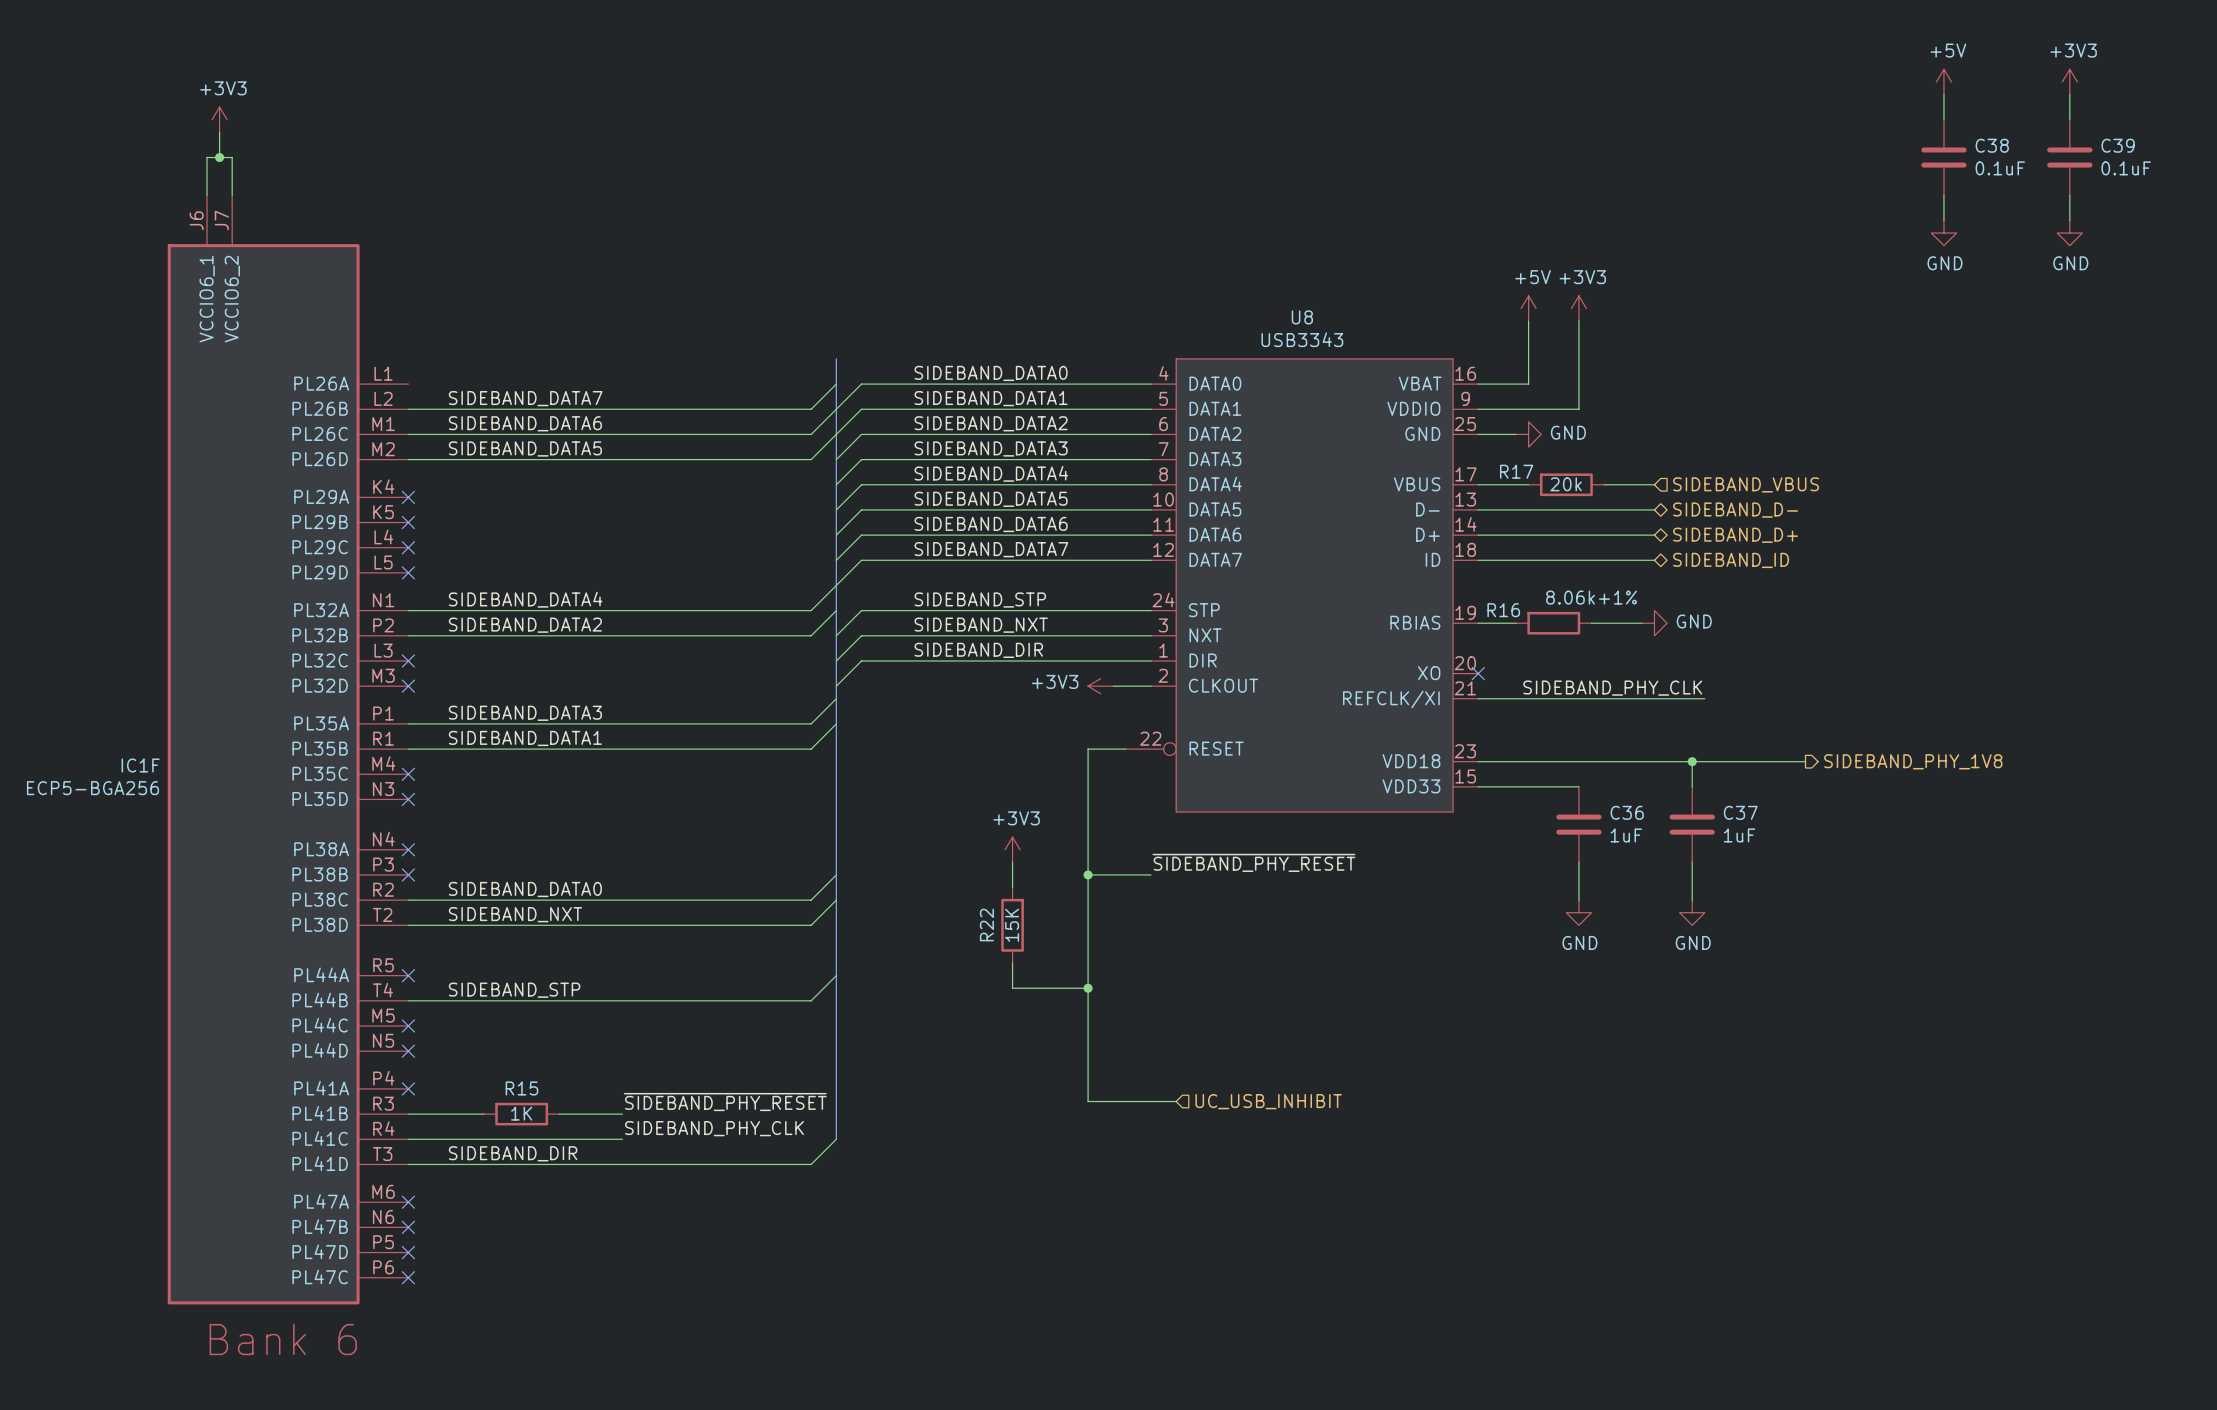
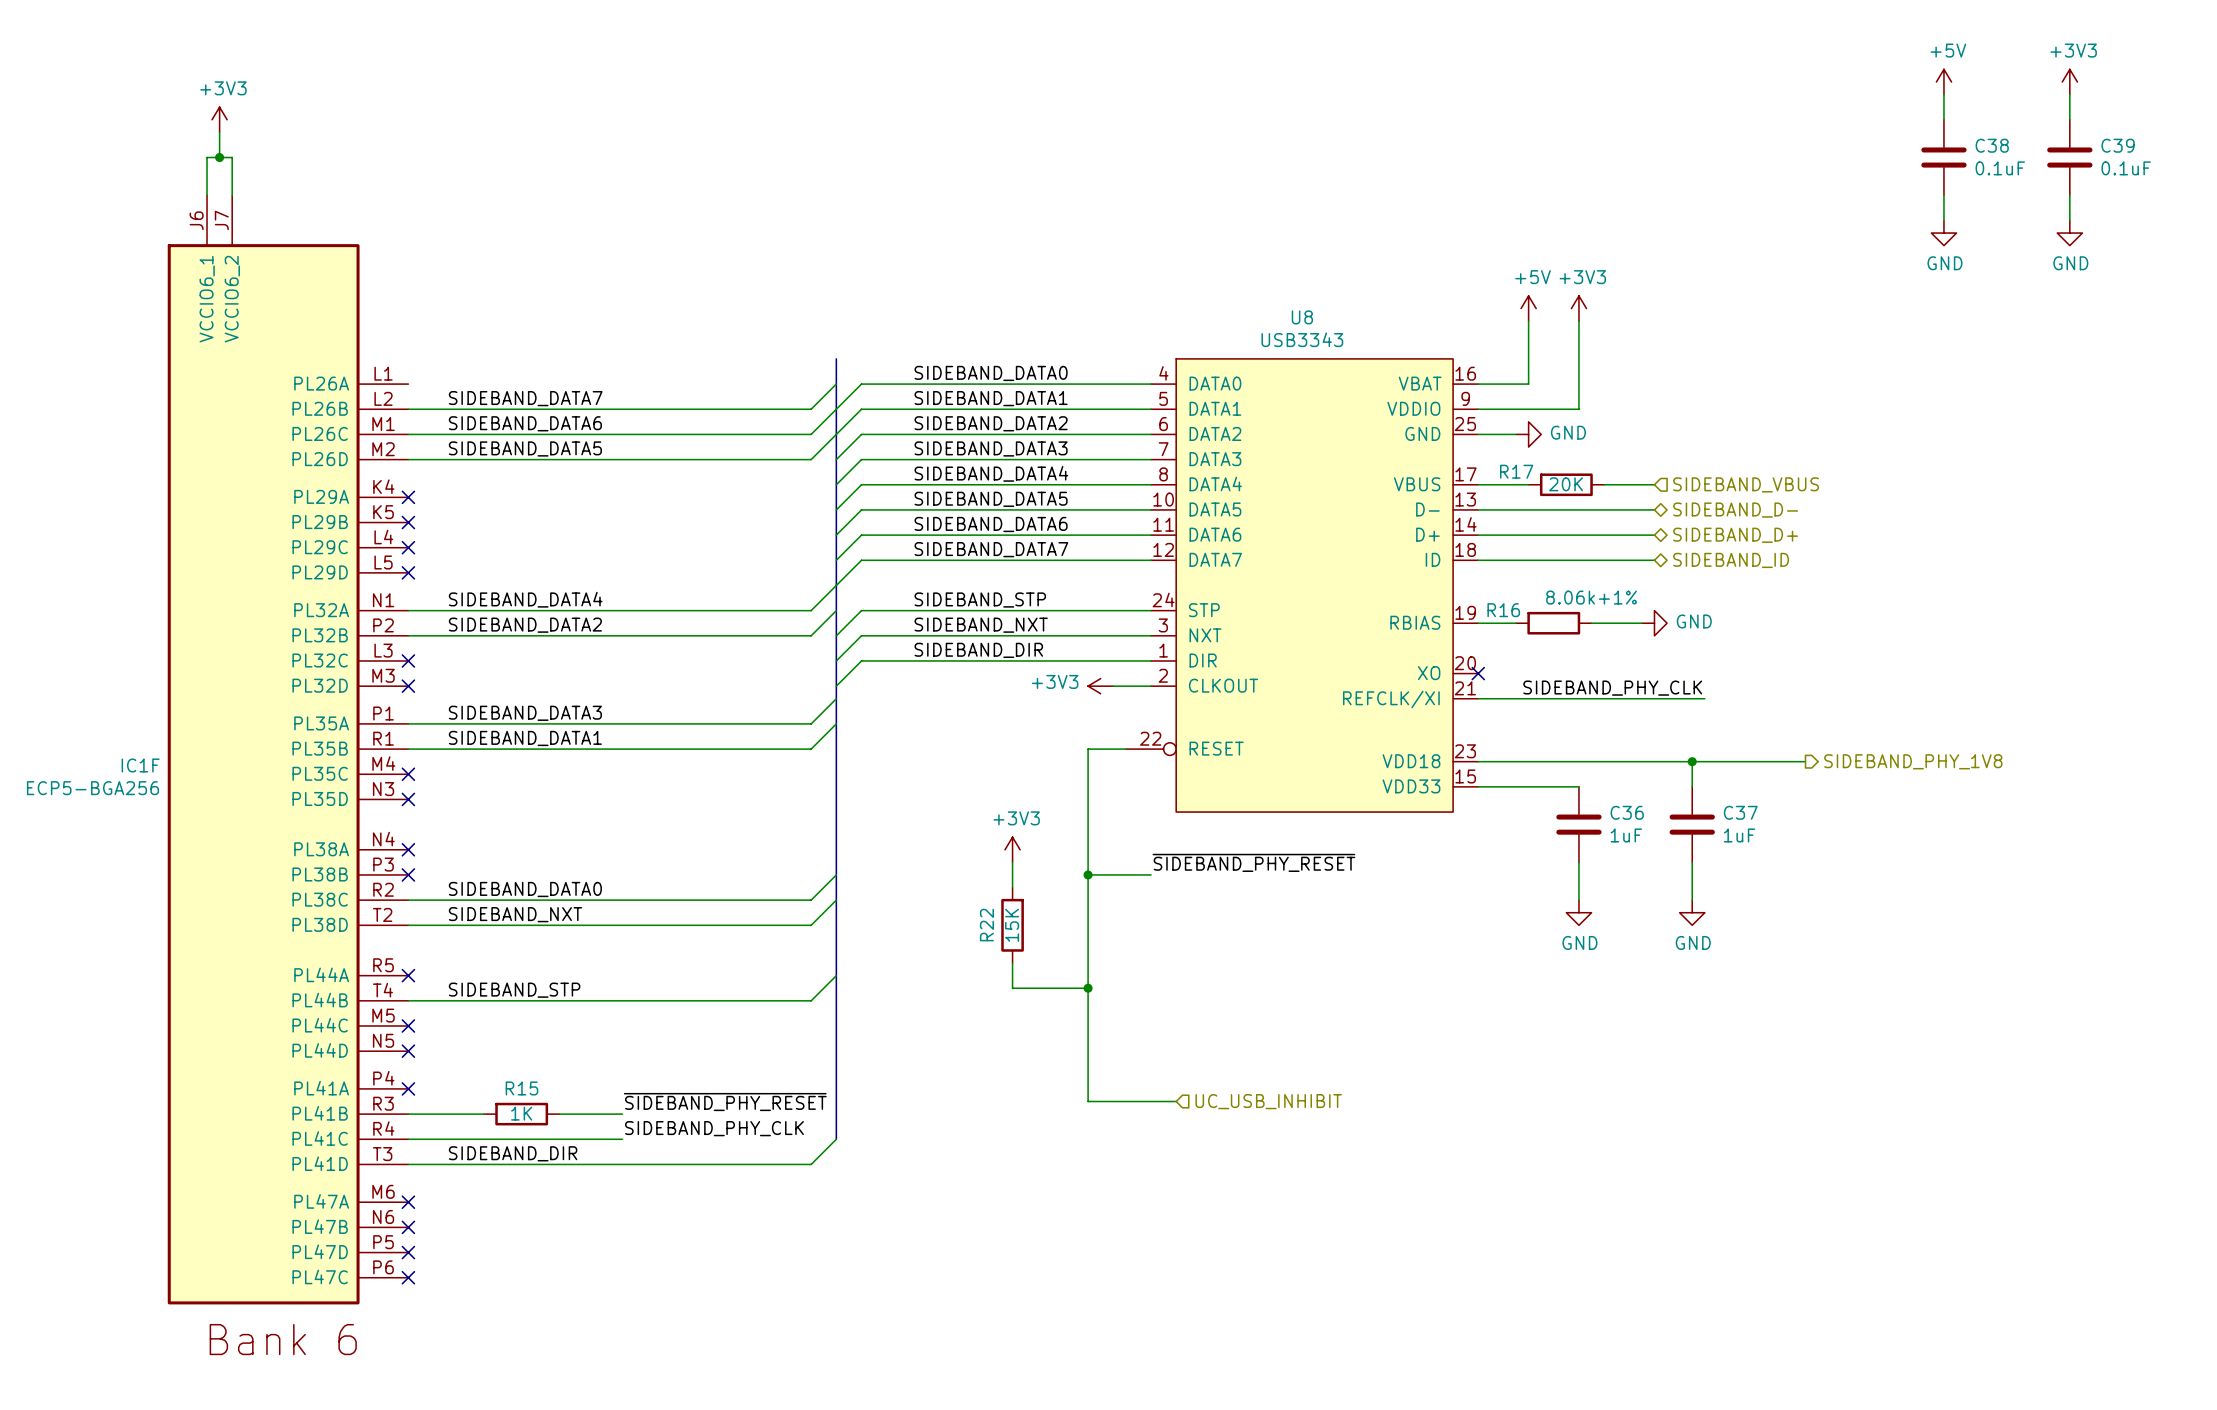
R17 value: 20k (1566, 484) -> 20K (1566, 484)

